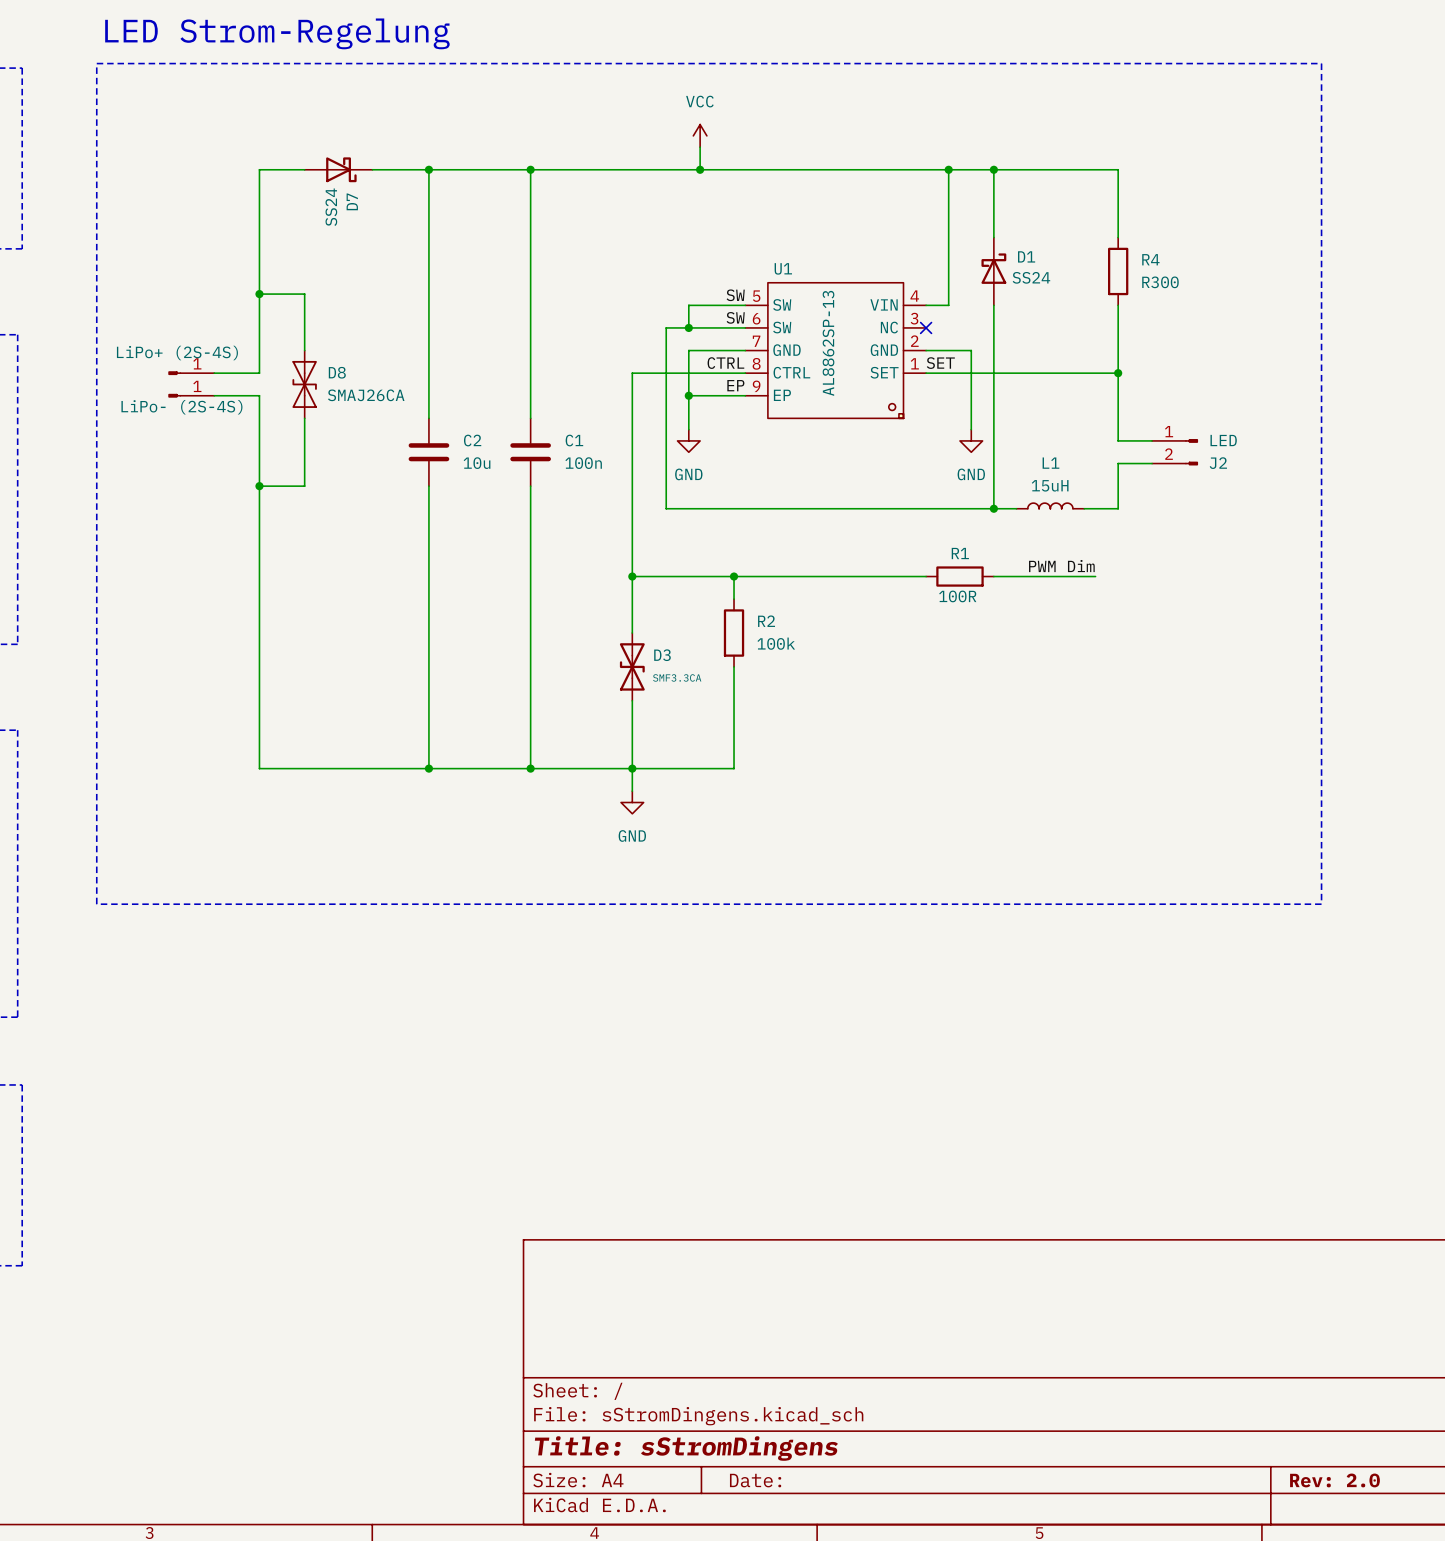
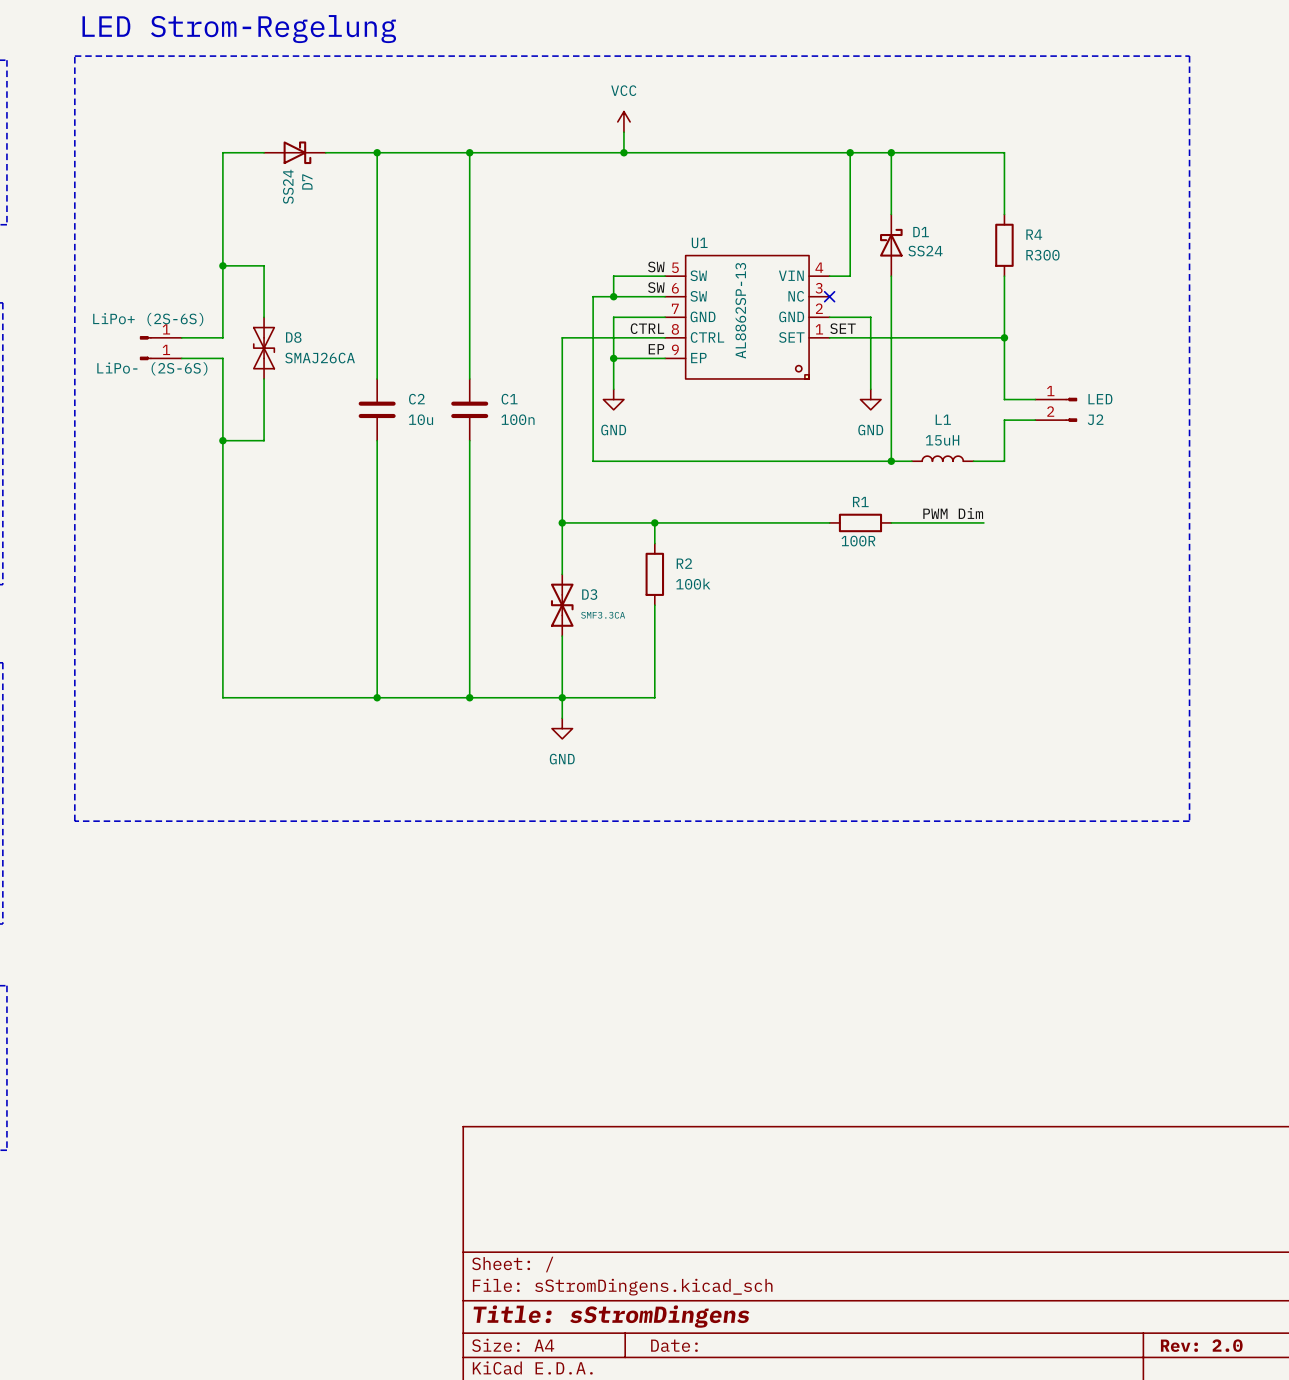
part value: LiPo+ (2S-4S) (177, 353) -> LiPo+ (2S-6S) (148, 319)
part value: LiPo- (2S-4S) (181, 407) -> LiPo- (2S-6S) (152, 368)

